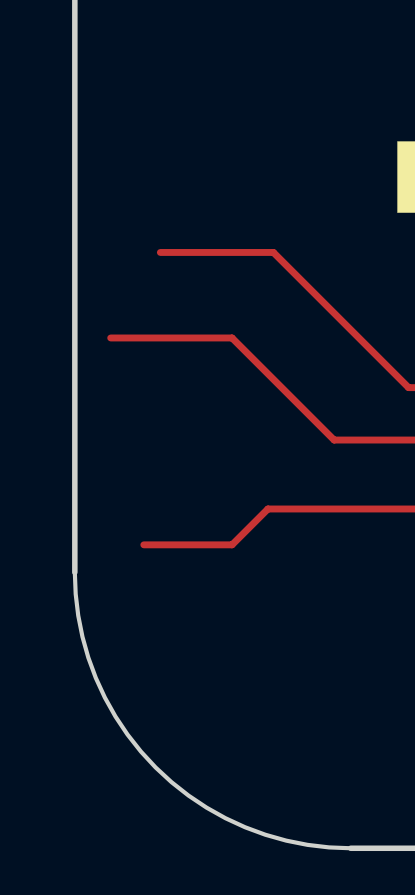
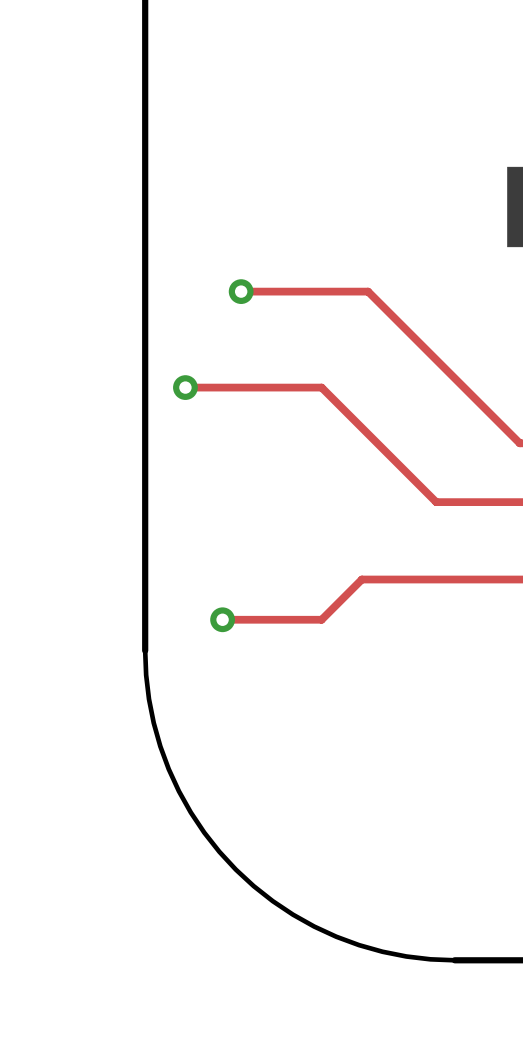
via: none -> (241, 291)
via: none -> (185, 387)
via: none -> (222, 619)

